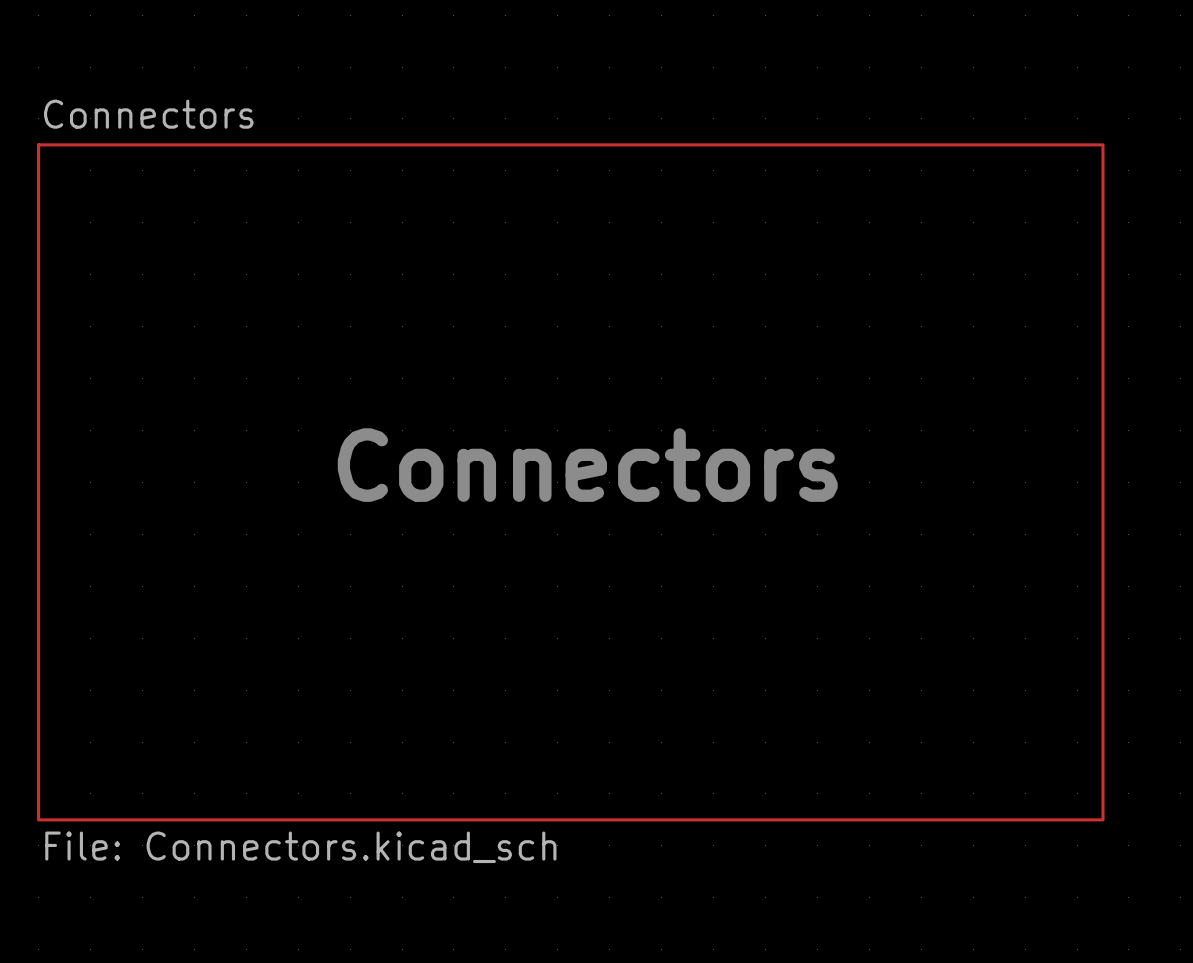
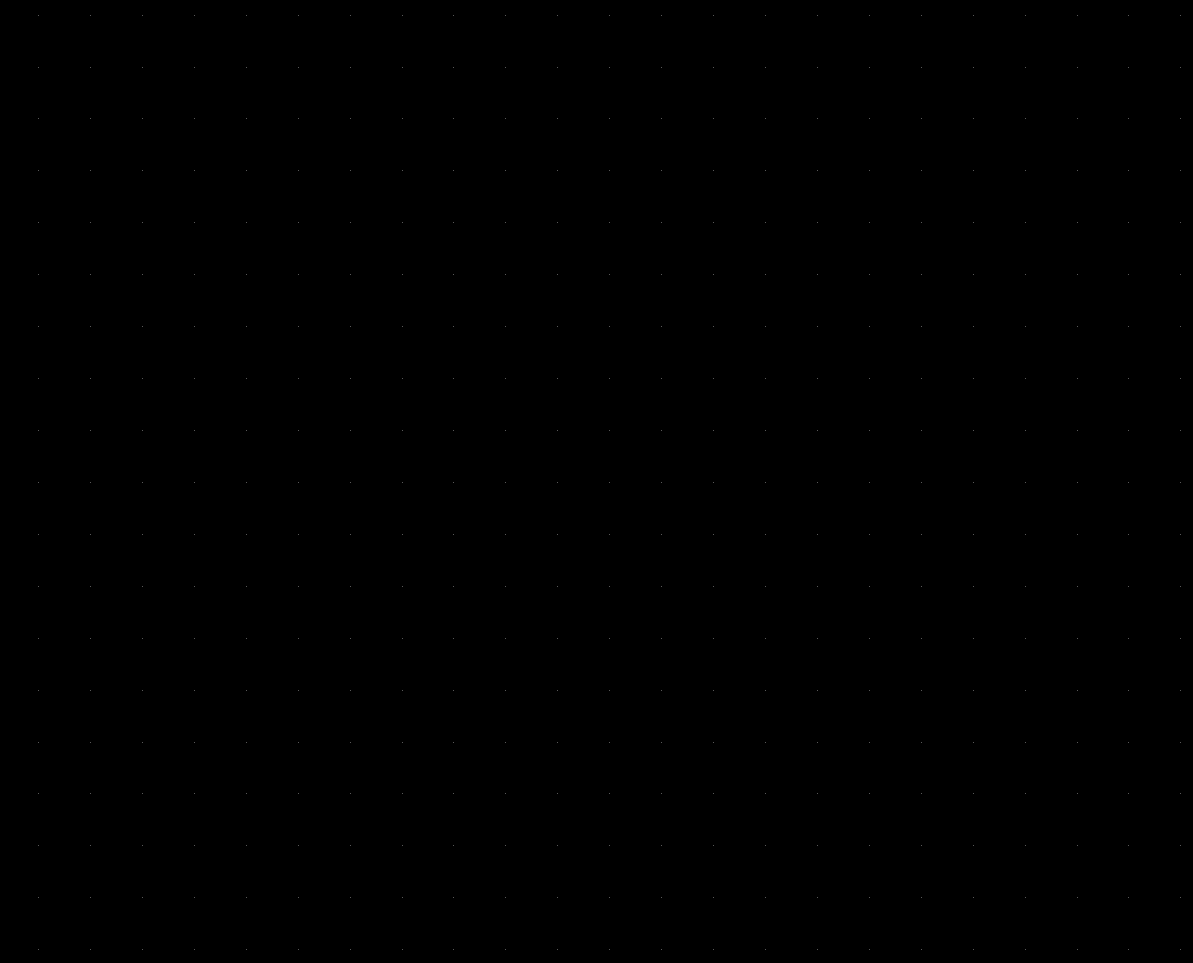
text: Connectors (587, 465) -> none
sheet Connectors: File: Connectors.kicad_sch (570, 482) -> none

